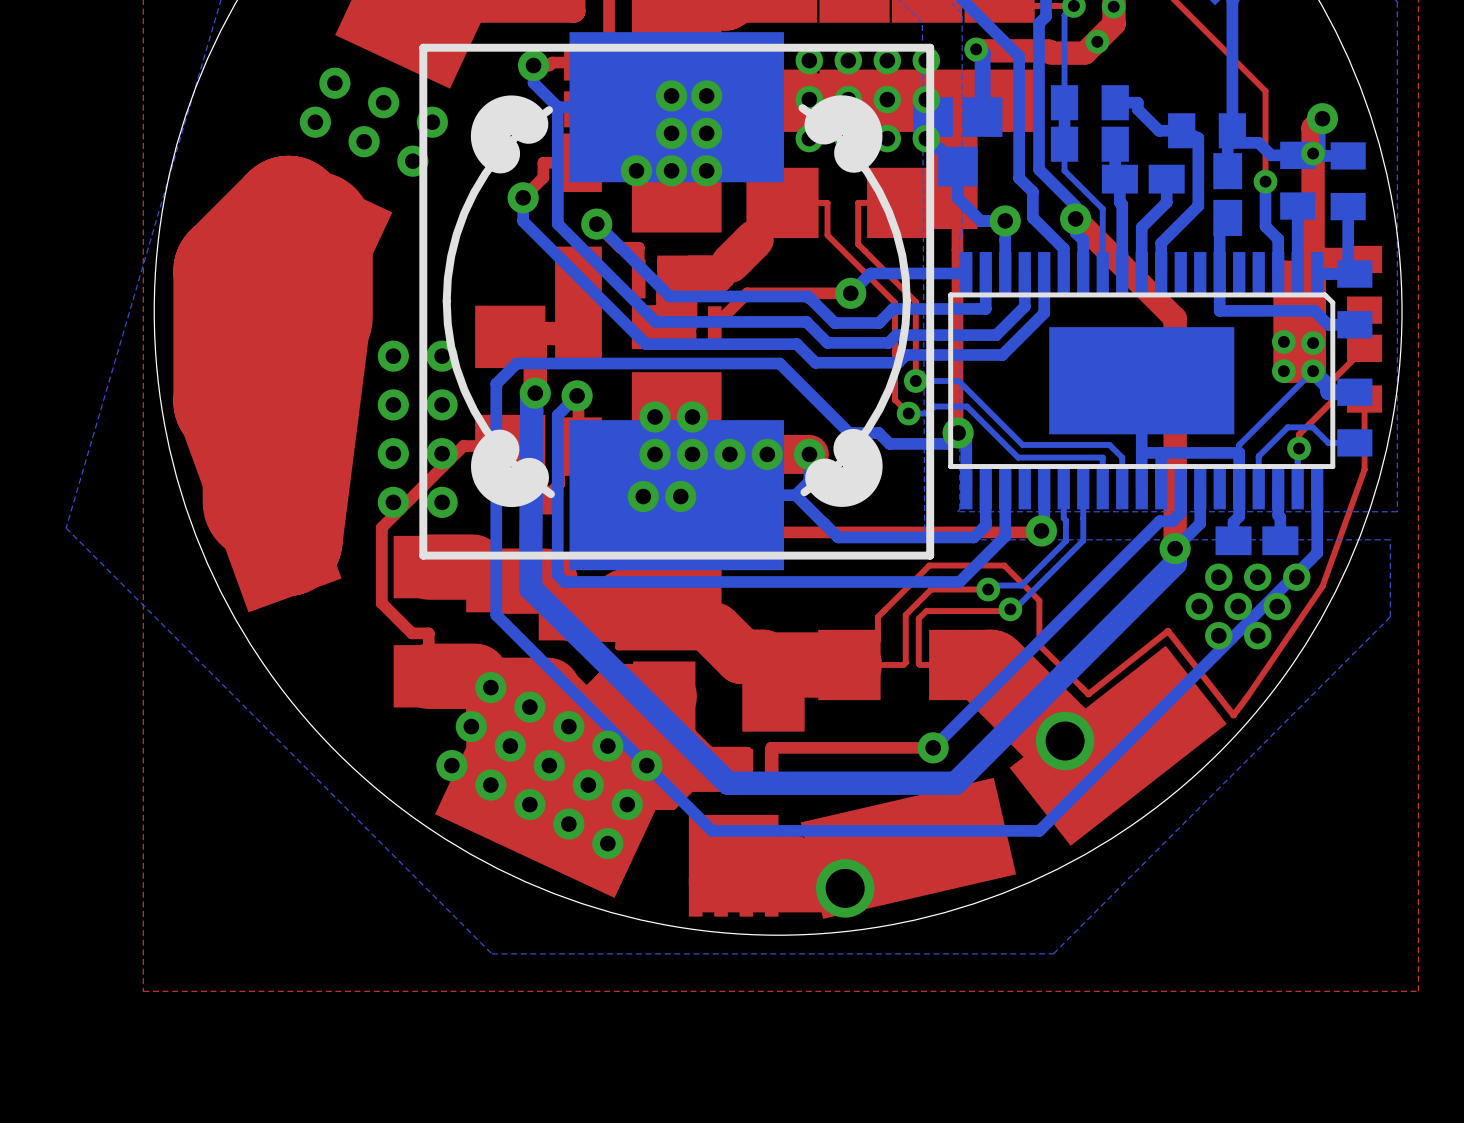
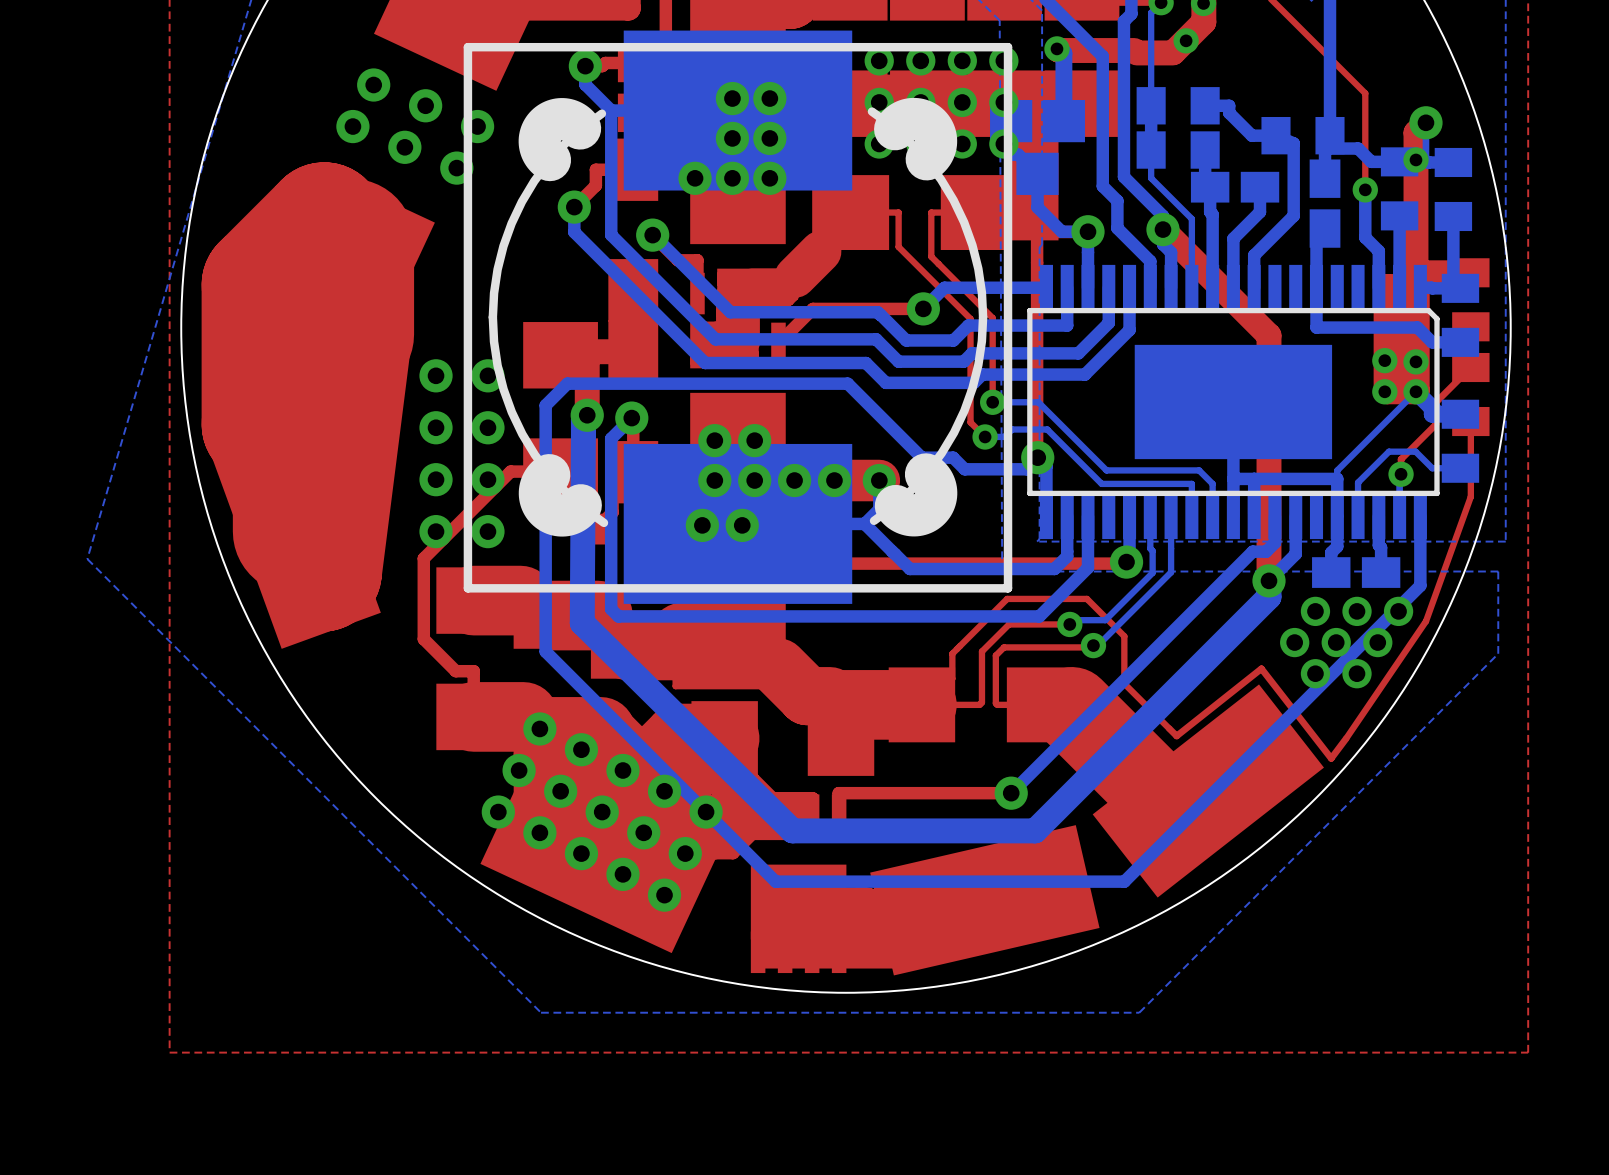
via: (1065, 741) -> none
via: (845, 888) -> none

